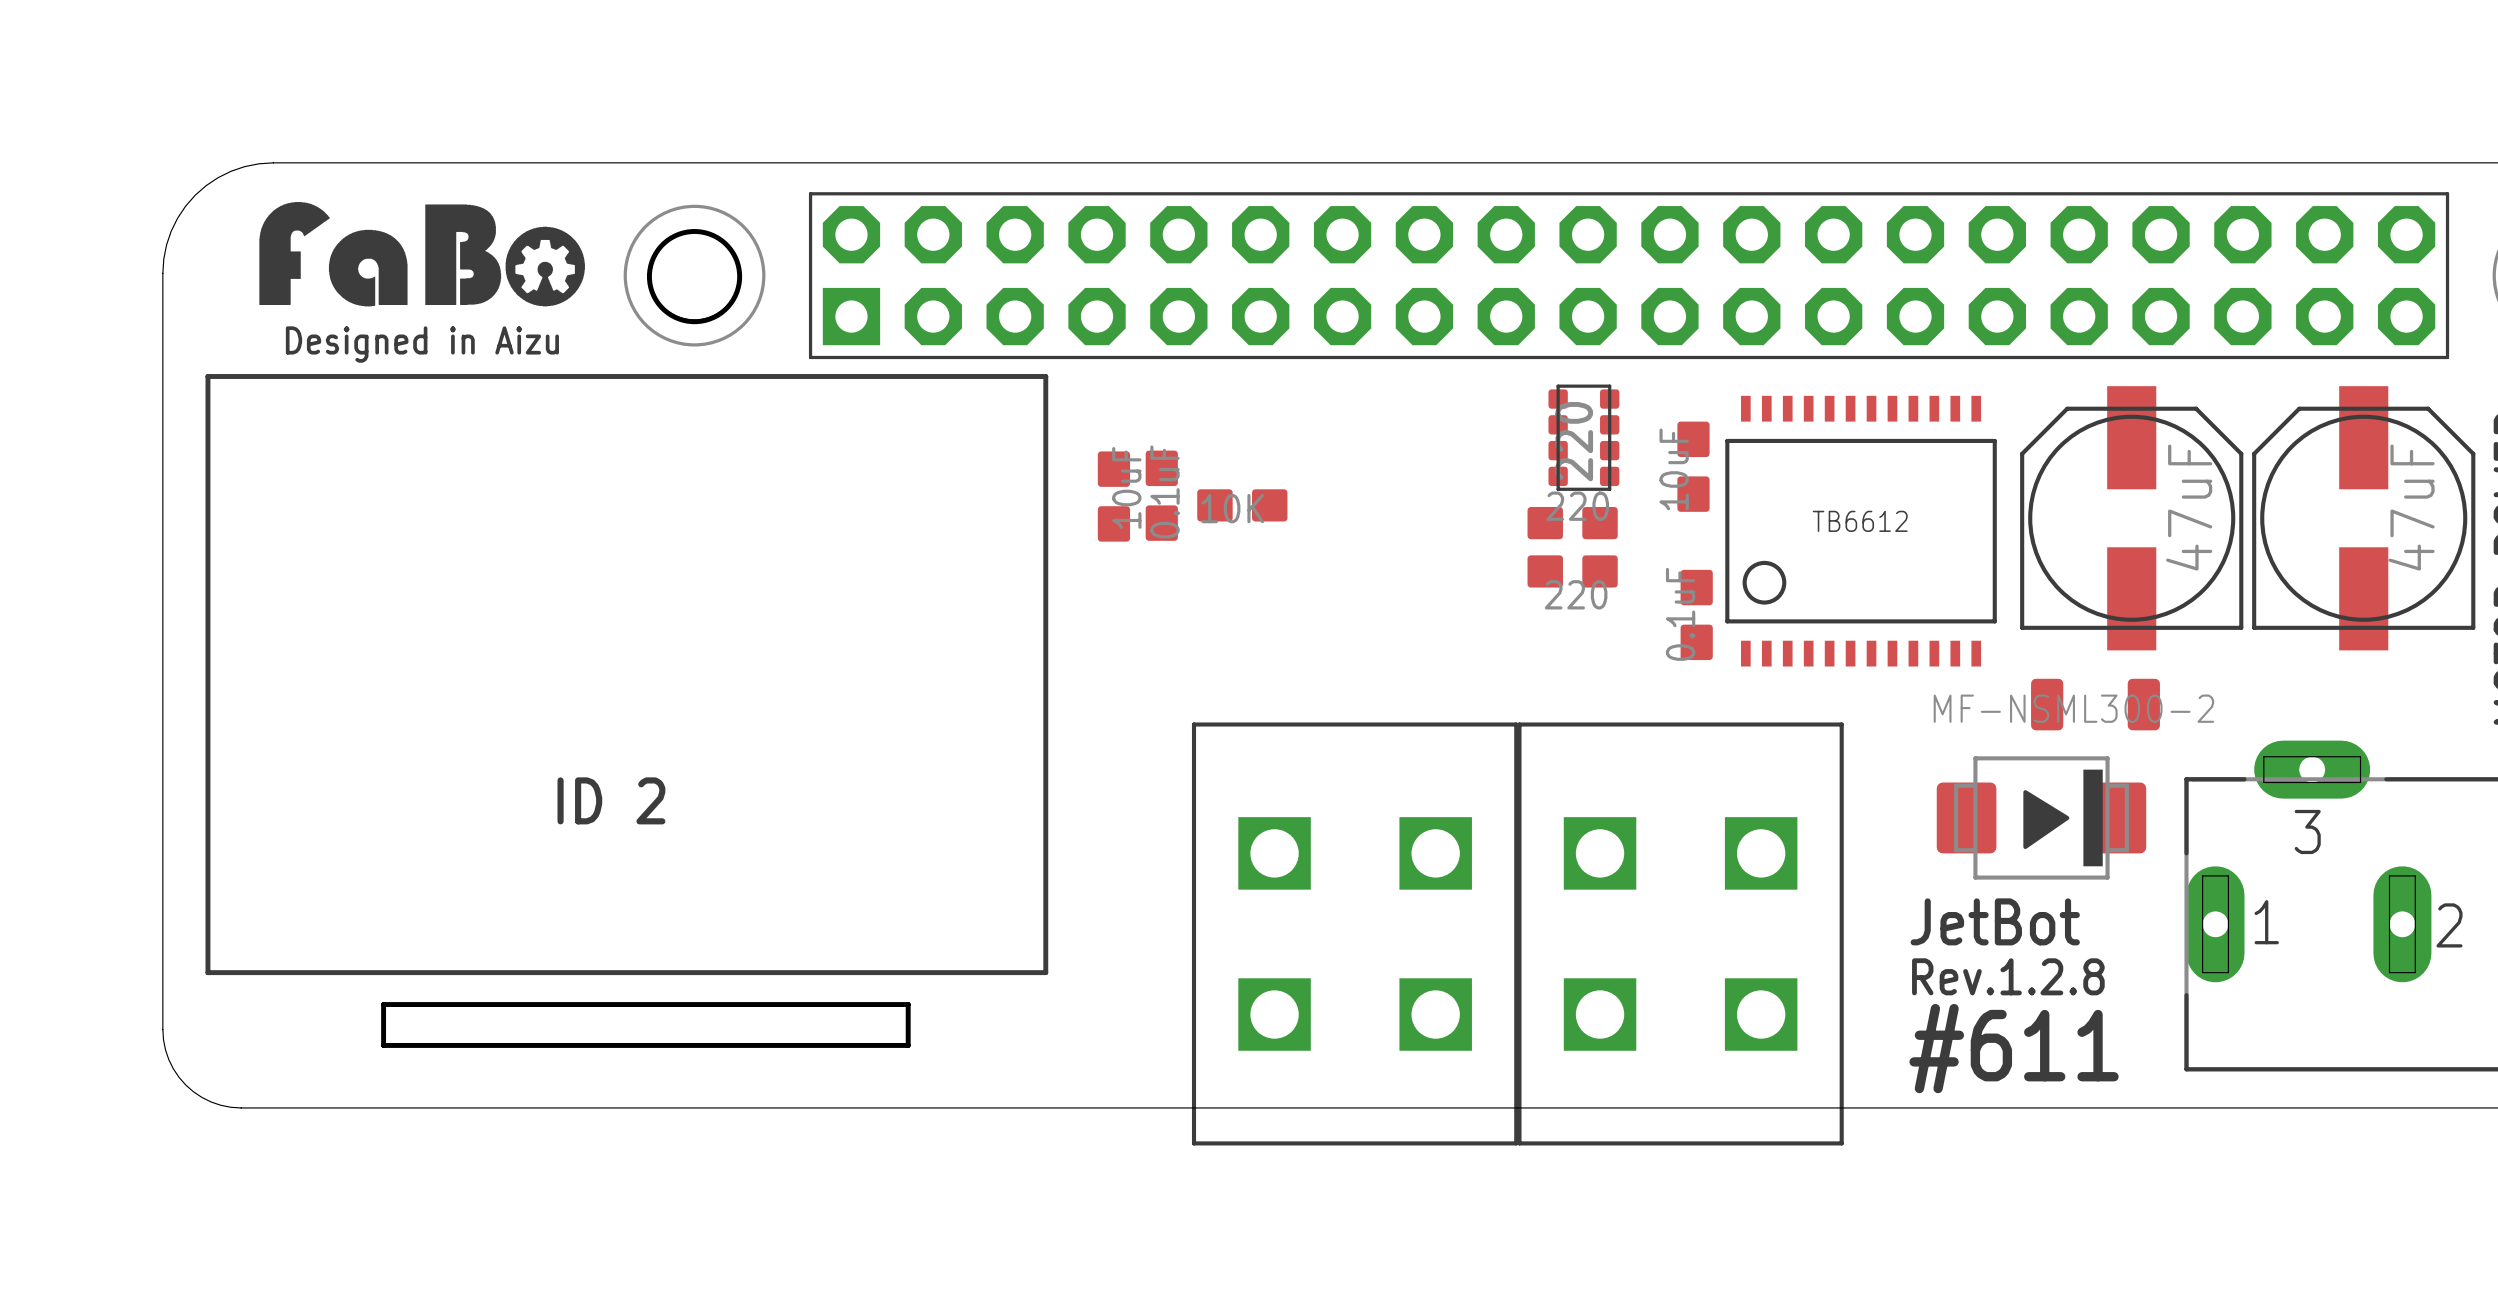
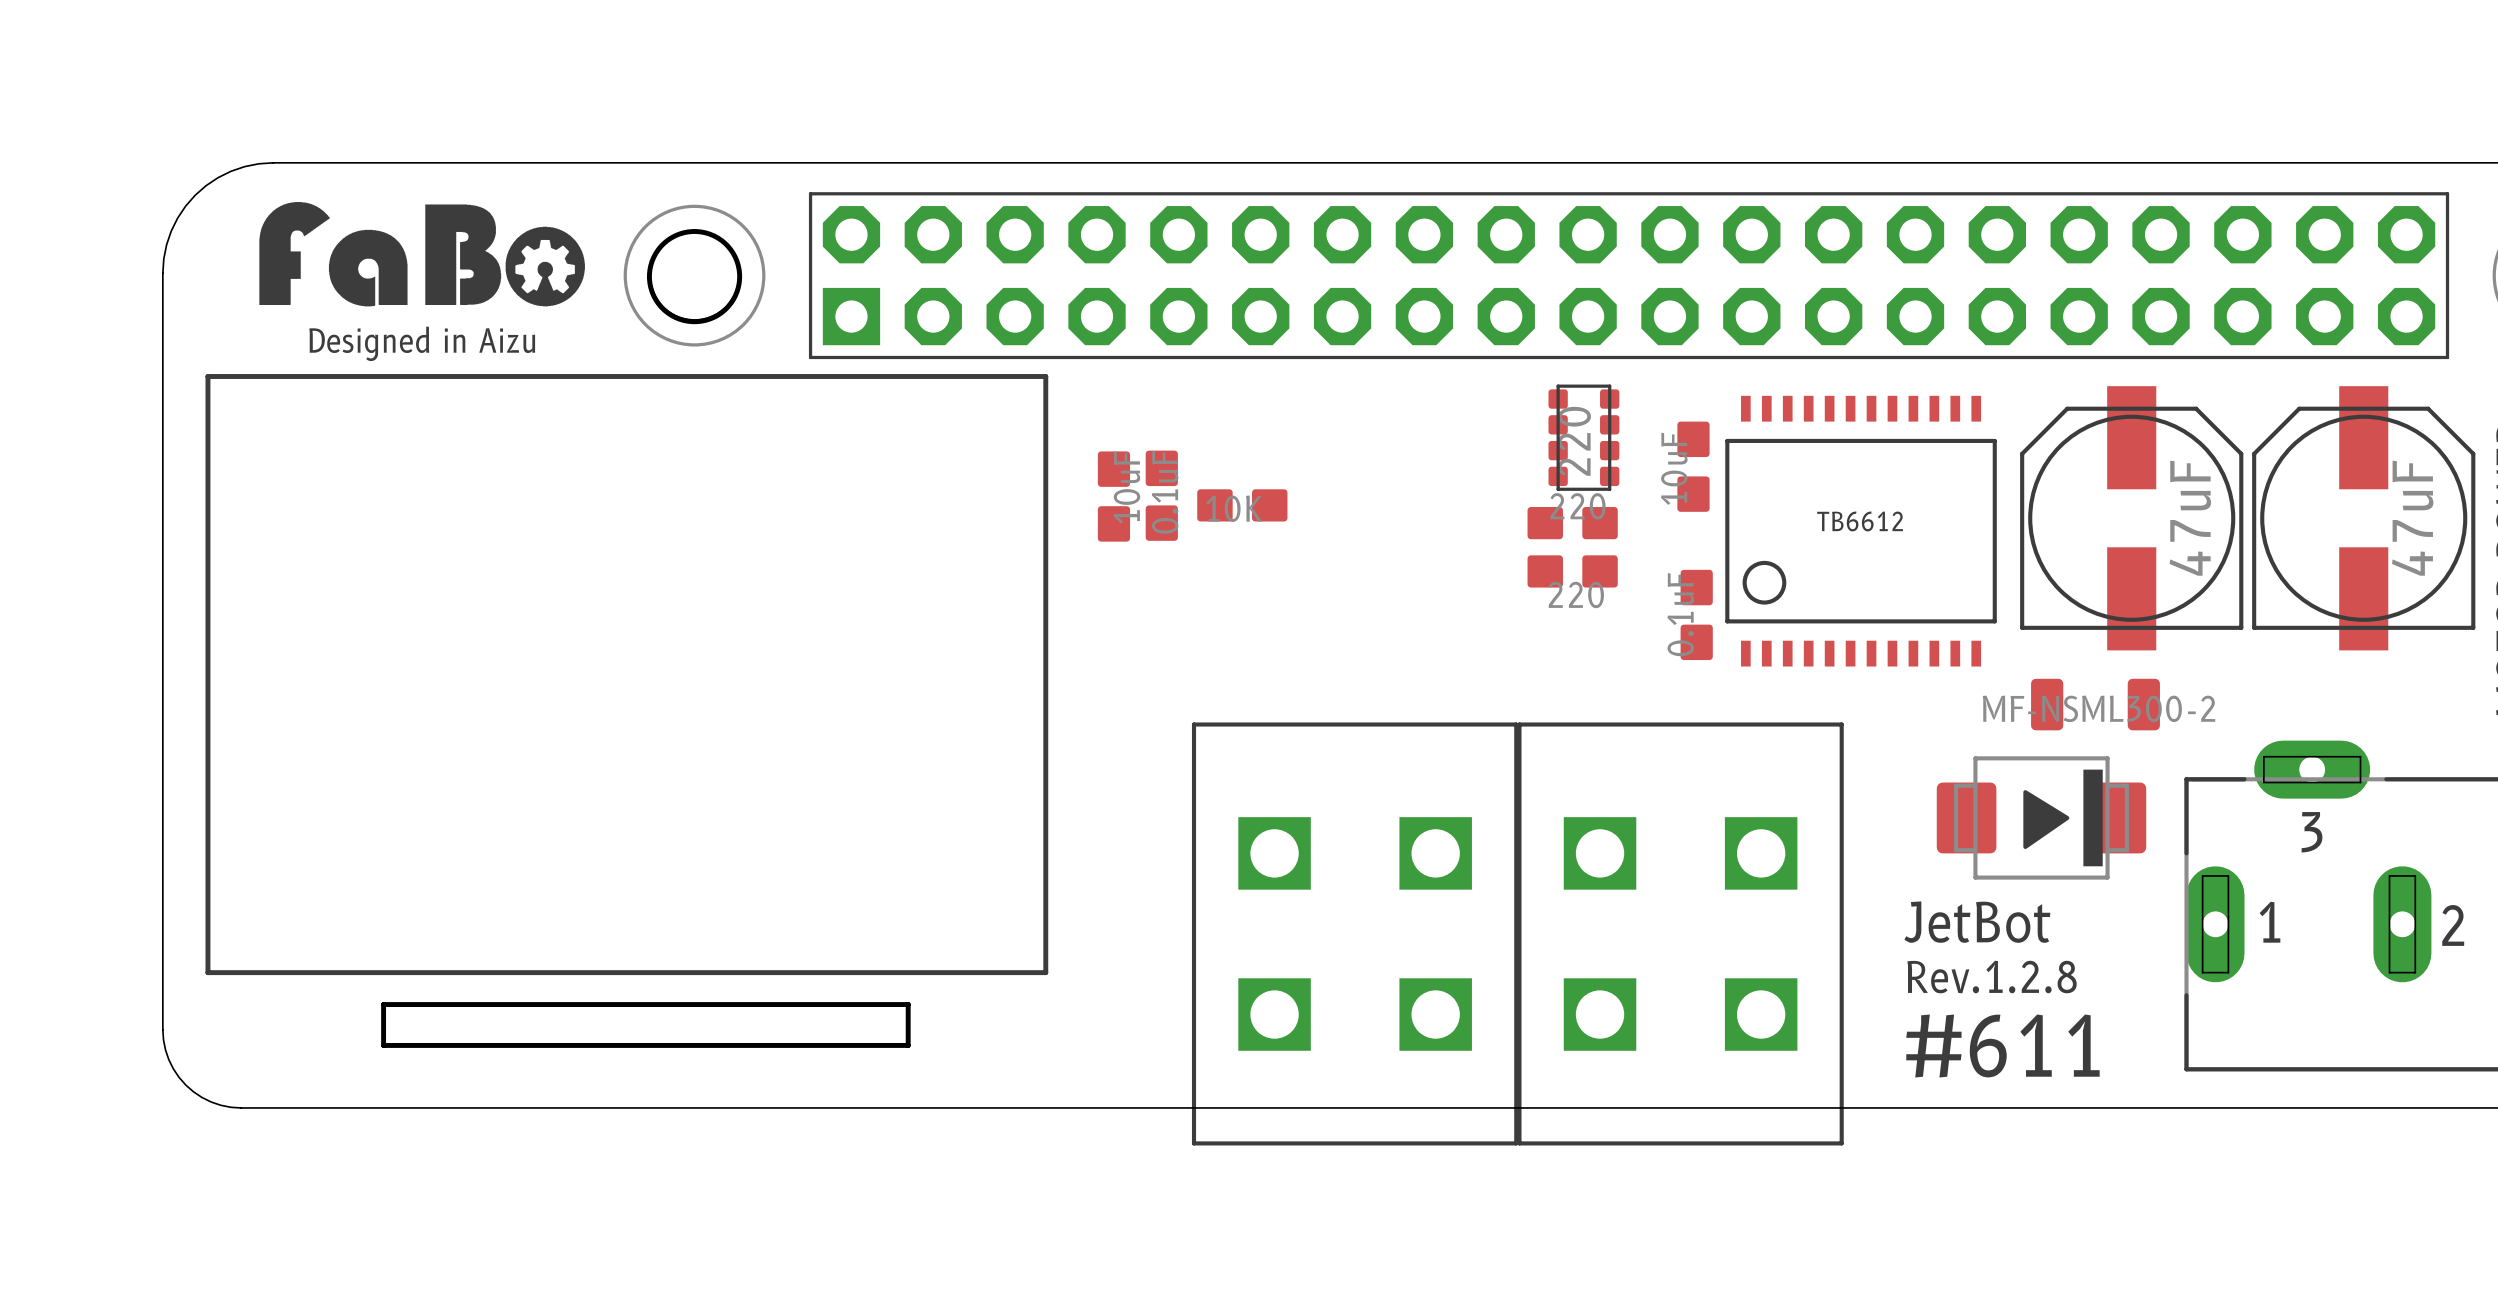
text: ID 2 (611, 800) -> none

